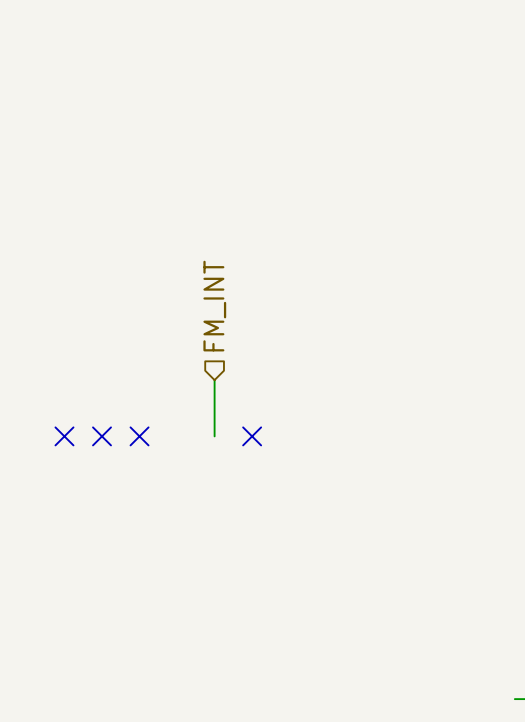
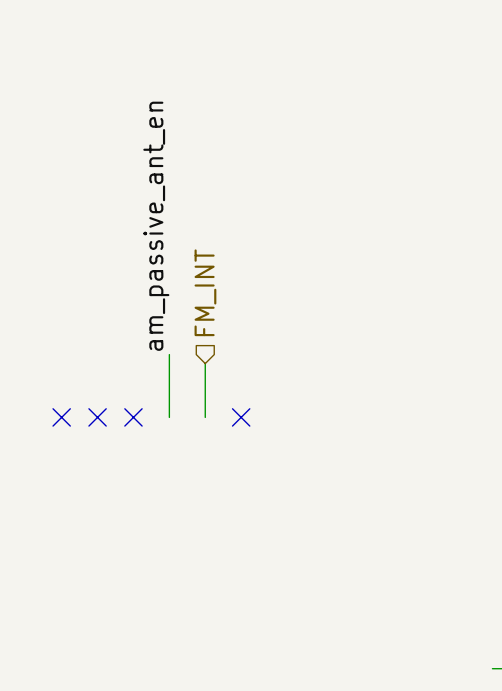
label: none -> am_passive_ant_en (156, 226)
wire: none -> (169, 354) (169, 417)

